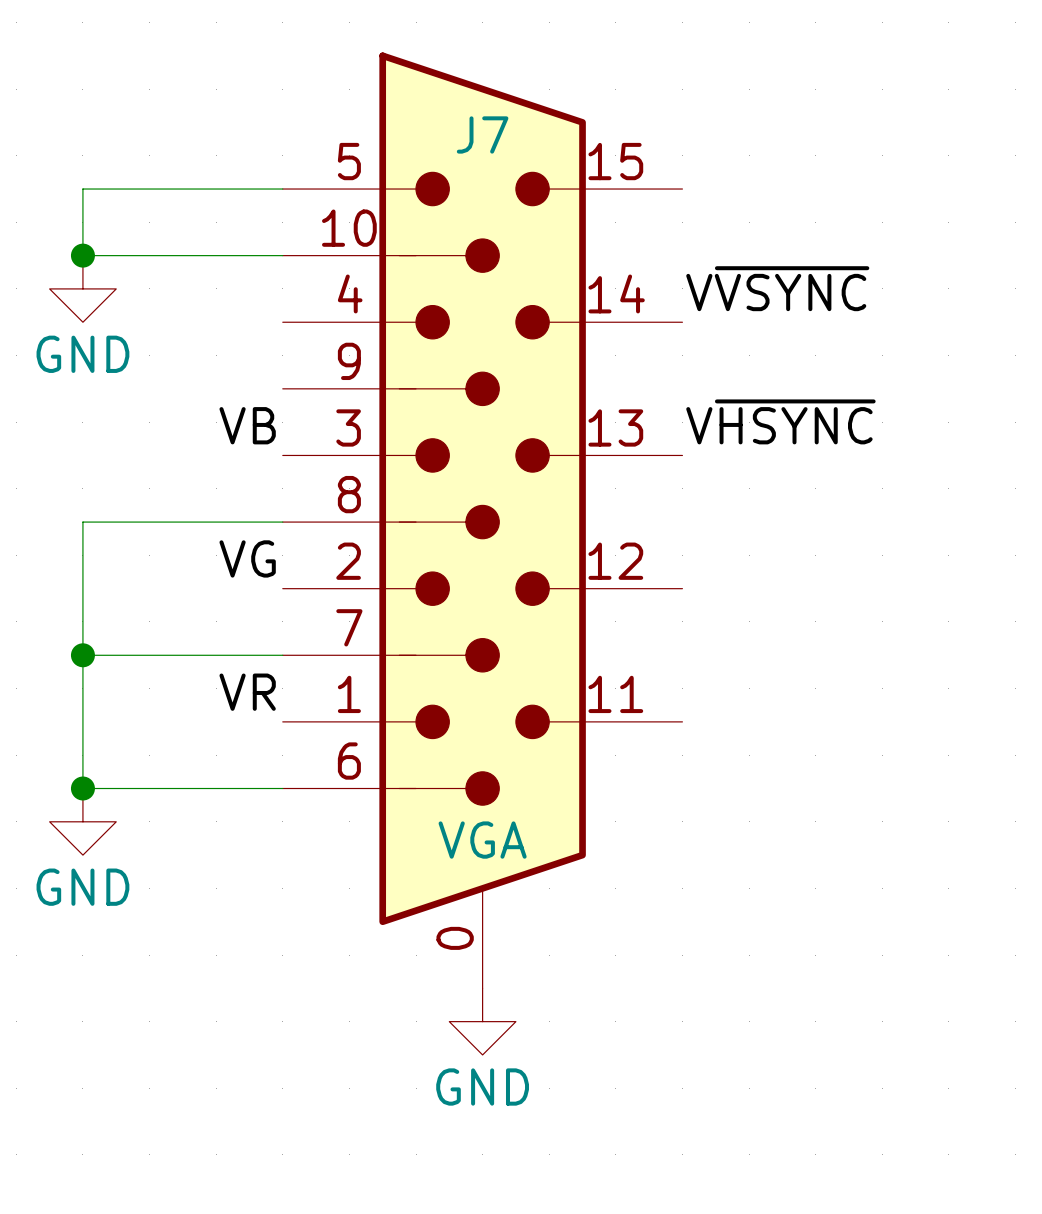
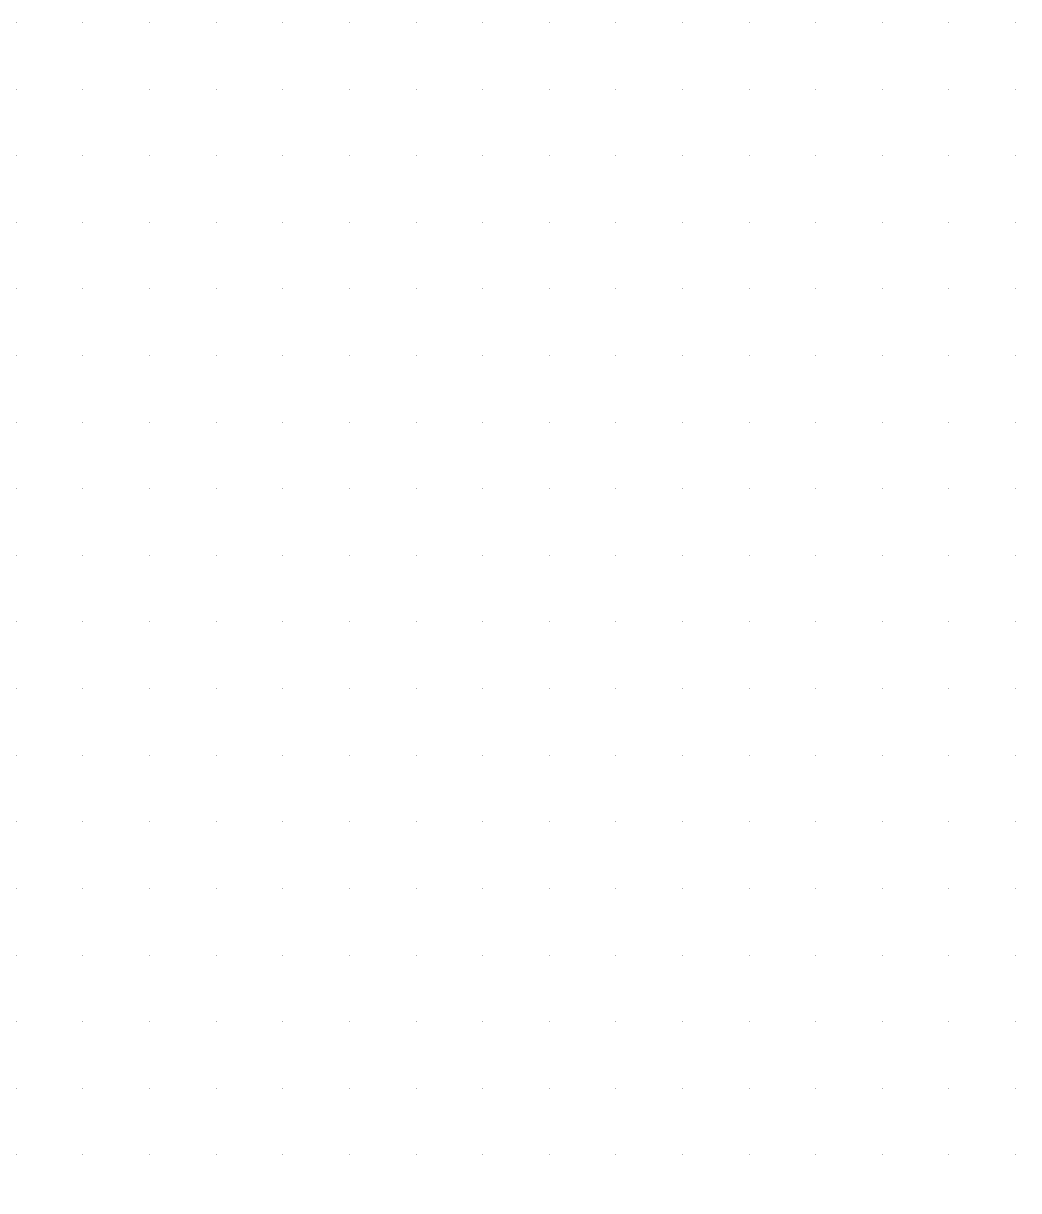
wire: (282, 189) (82, 189) (82, 255) (282, 255) -> none
junction: (82, 255) -> none
power symbol: GND (82, 288) -> none
label: V~{VSYNC} (777, 288) -> none
label: V~{HSYNC} (780, 421) -> none
label: VB (247, 425) -> none
J7: VGA (482, 520) -> none
wire: (282, 522) (82, 522) (82, 788) (282, 788) -> none
label: VG (247, 558) -> none
wire: (82, 655) (282, 655) -> none
junction: (82, 655) -> none
label: VR (247, 692) -> none
junction: (82, 788) -> none
power symbol: GND (82, 821) -> none
power symbol: GND (482, 1021) -> none

